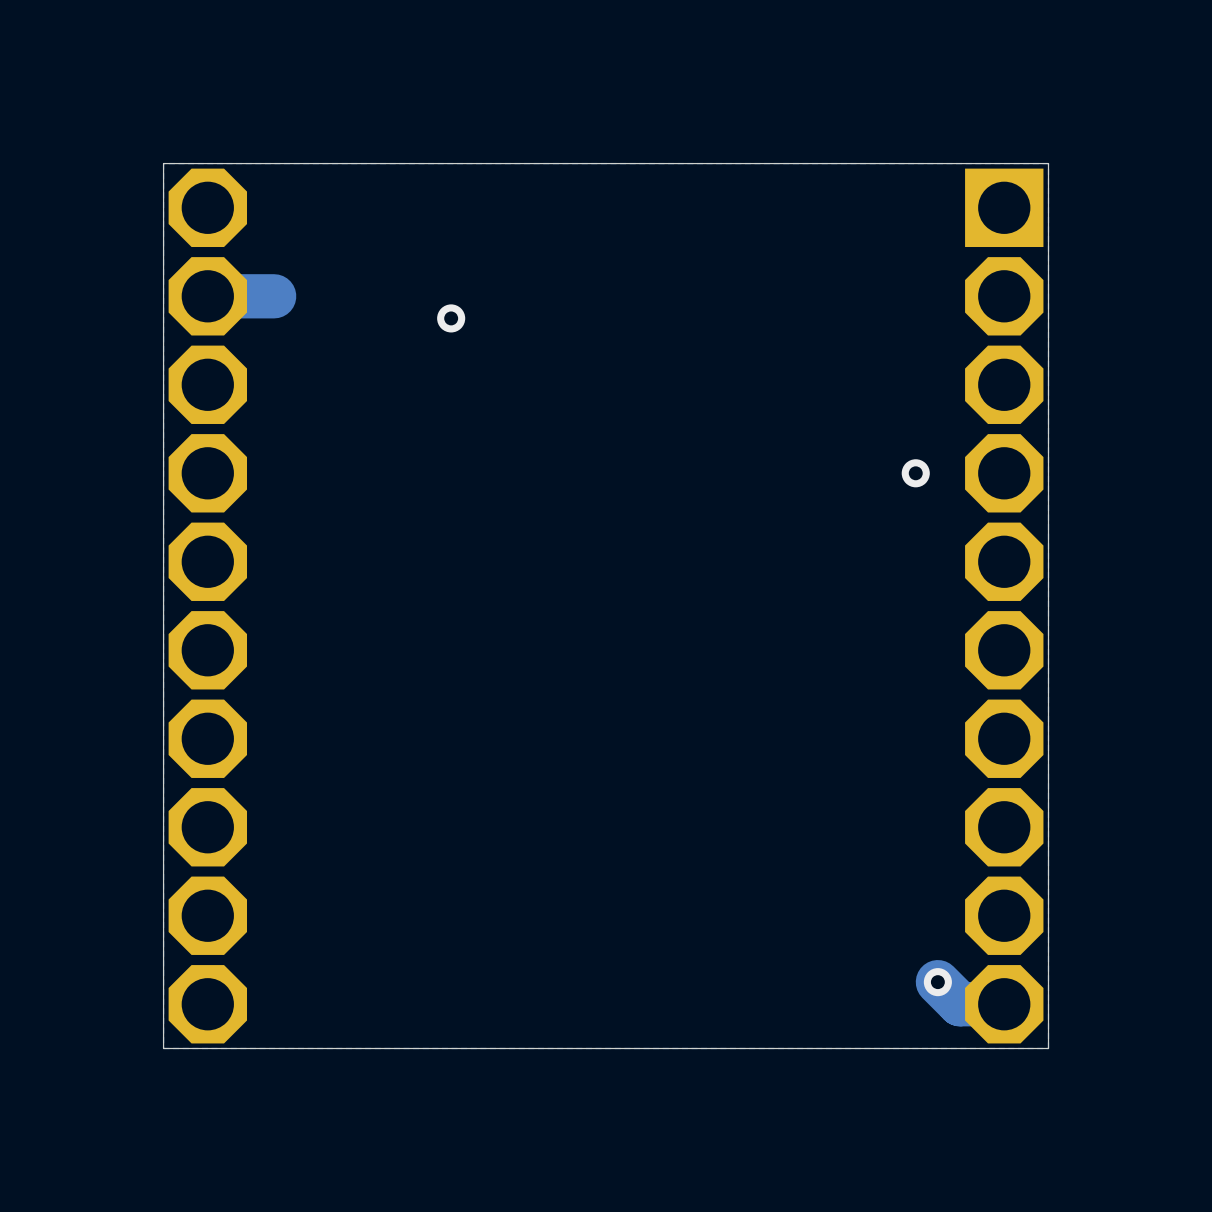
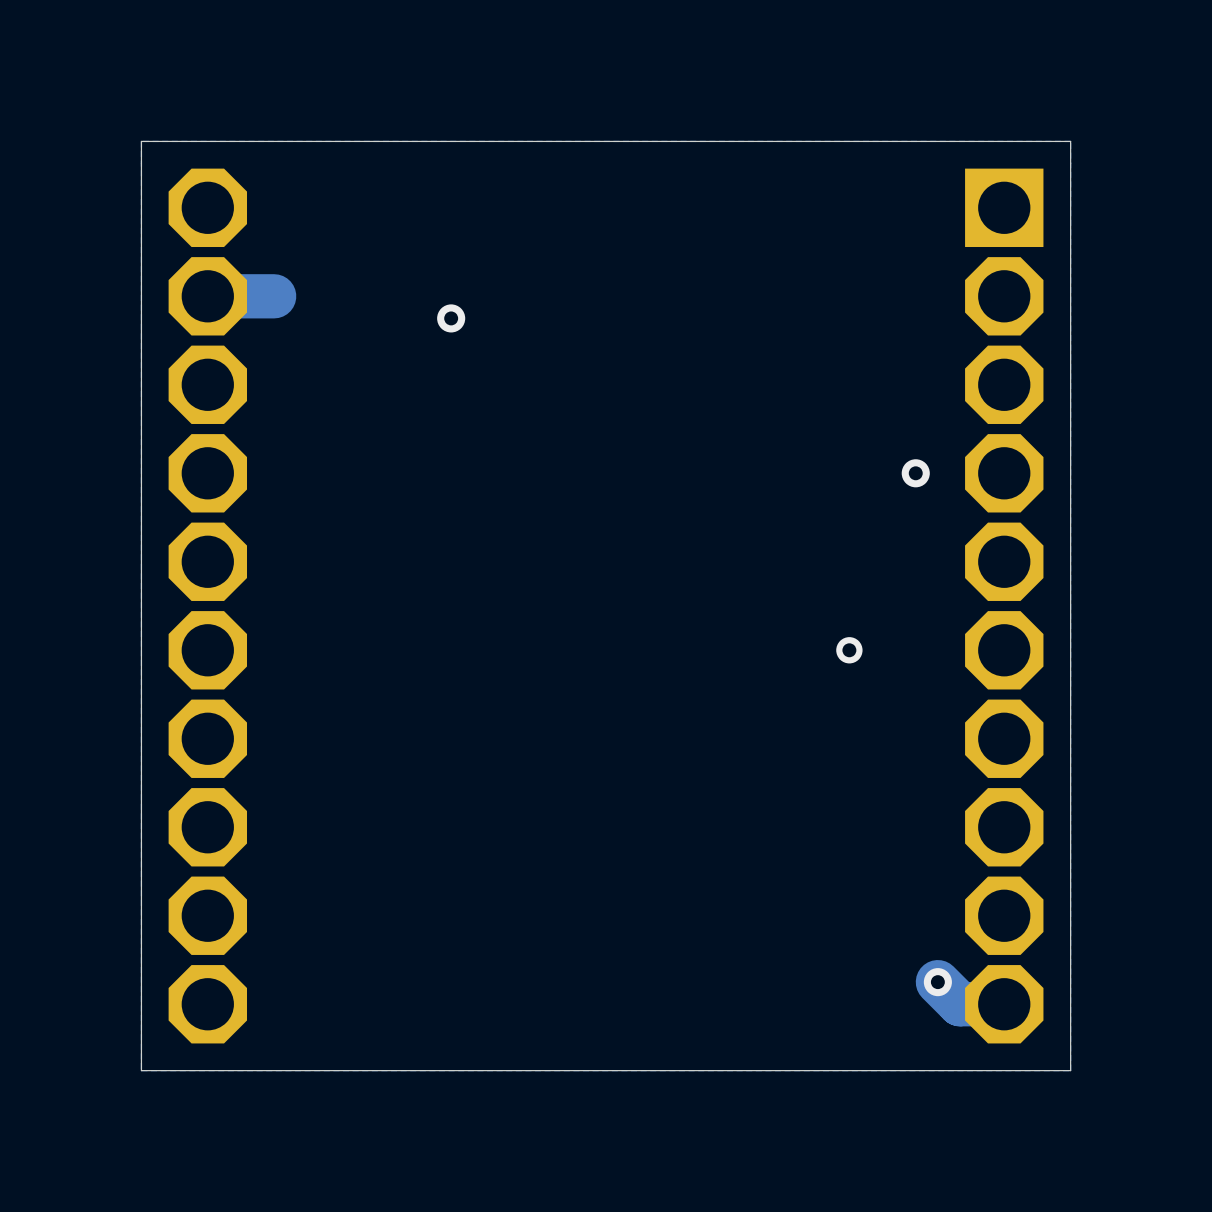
part footprint: [163, 163, 1049, 1049] -> [141, 163, 1071, 1071]
board edge: (1048, 163) (163, 163) -> none
board edge: none -> (1070, 163) (1070, 141) (141, 141) (141, 163)
via: none -> (849, 650)

